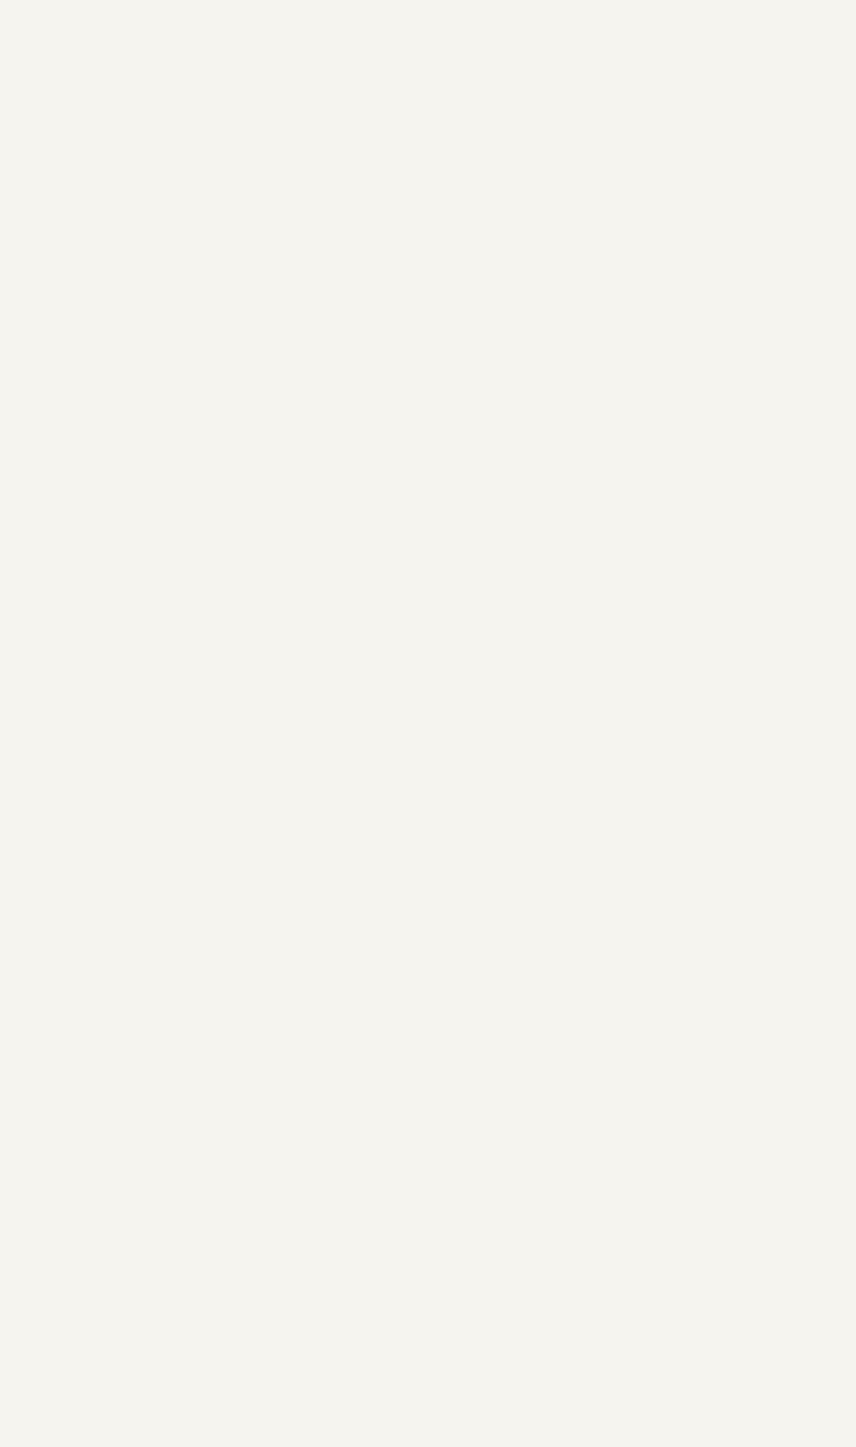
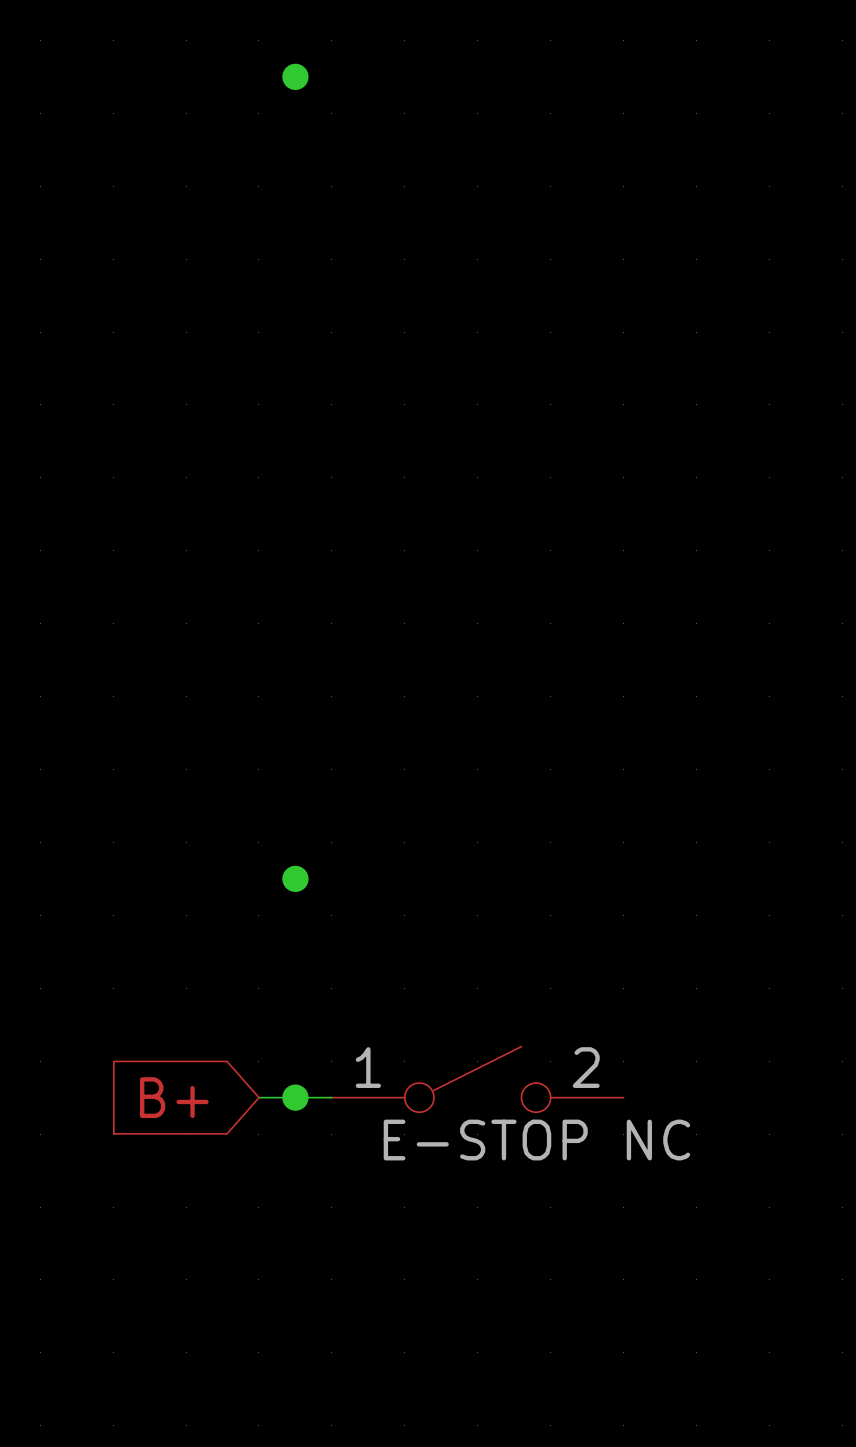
junction: none -> (295, 76)
junction: none -> (295, 878)
part: none -> E-STOP NC (477, 1079)
global label: none -> B+ (174, 1097)
wire: none -> (258, 1097) (331, 1097)
junction: none -> (295, 1097)

